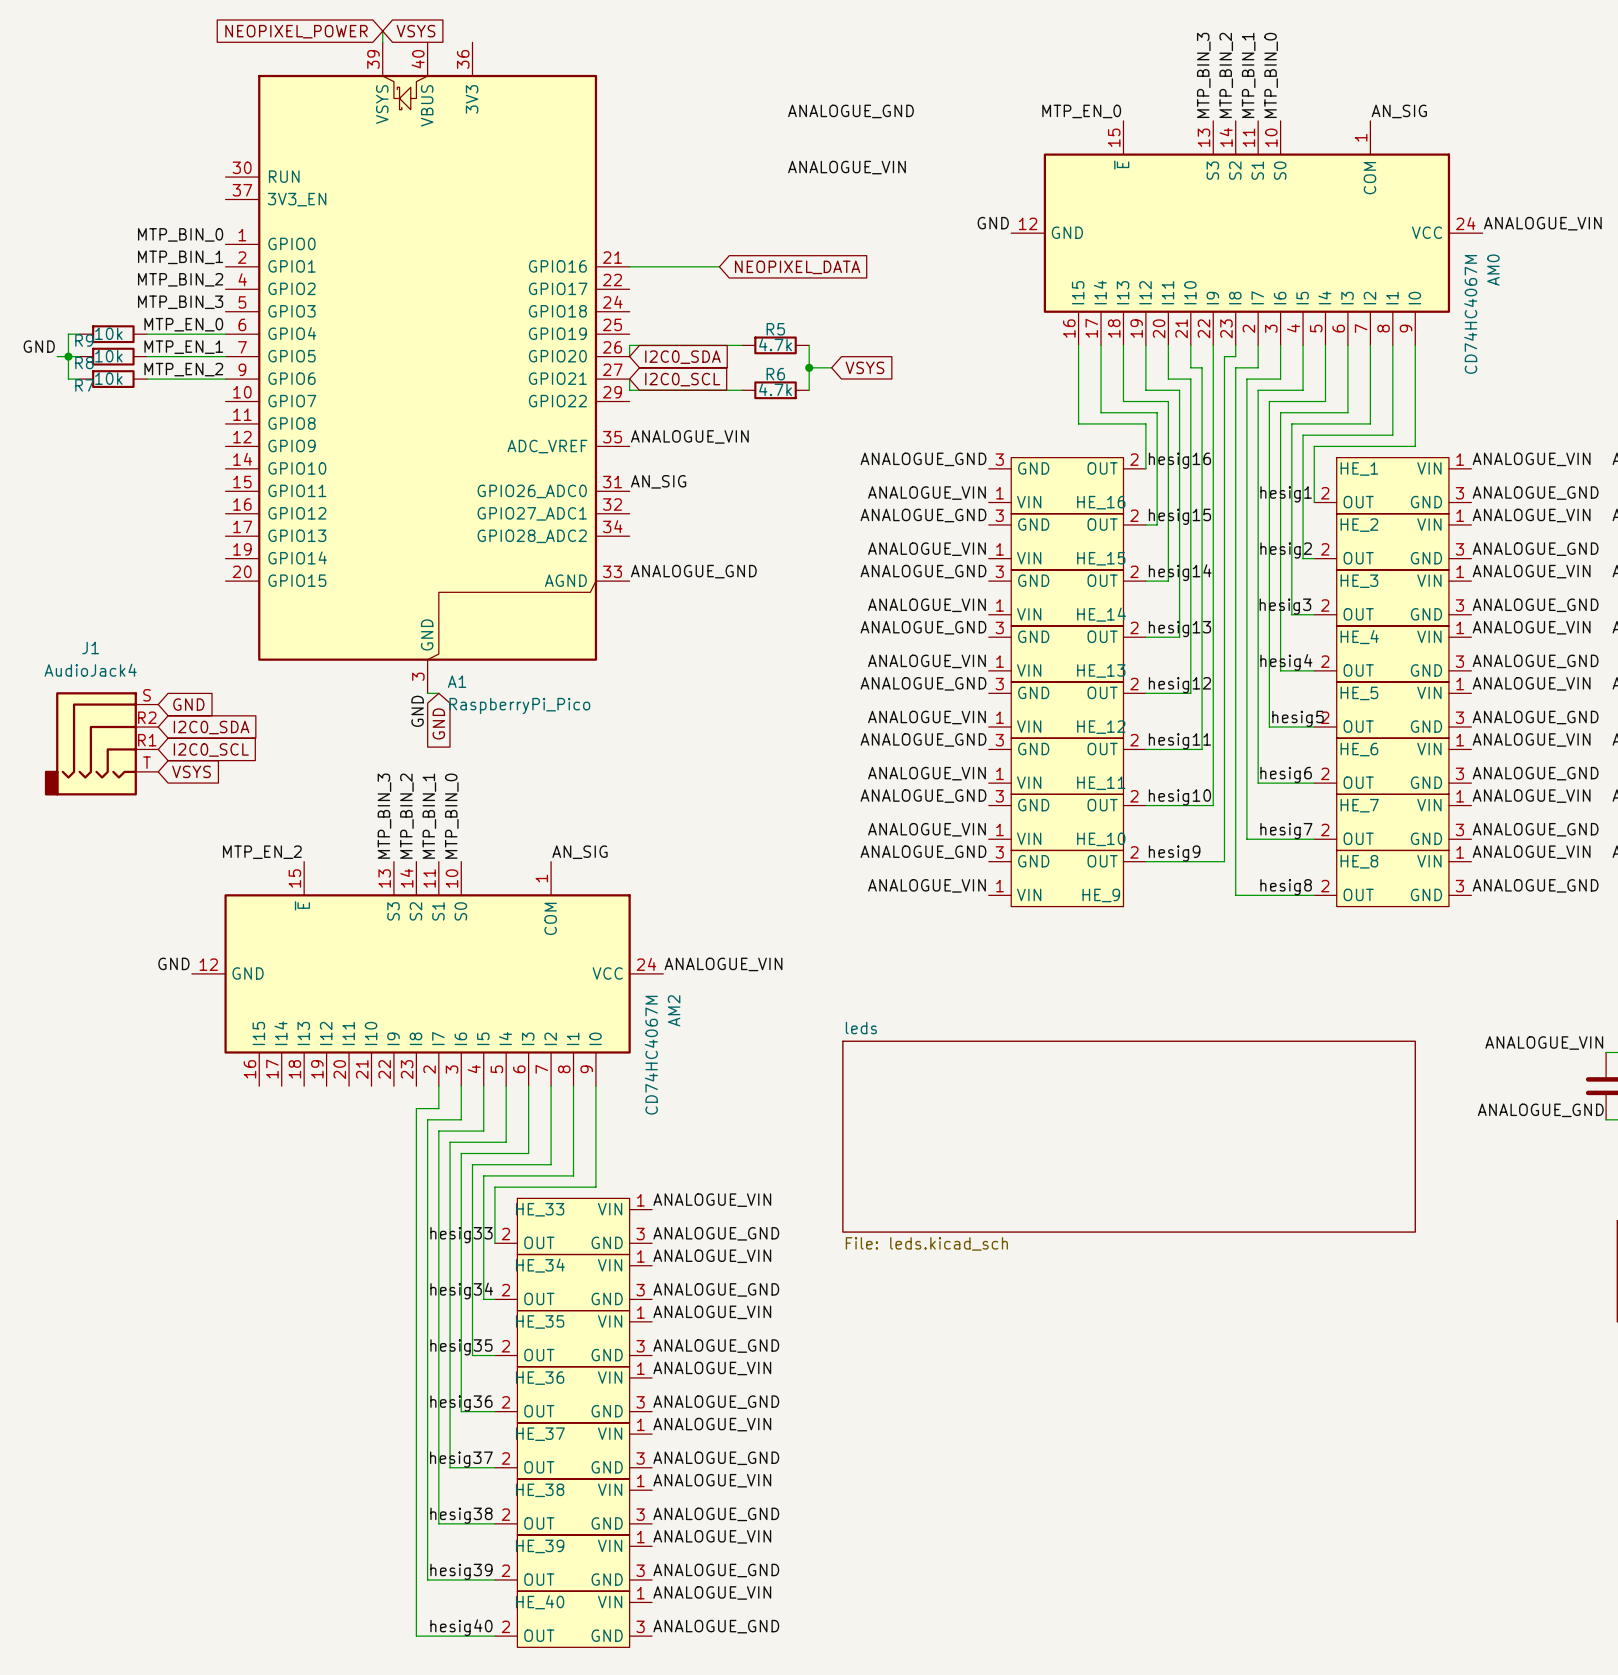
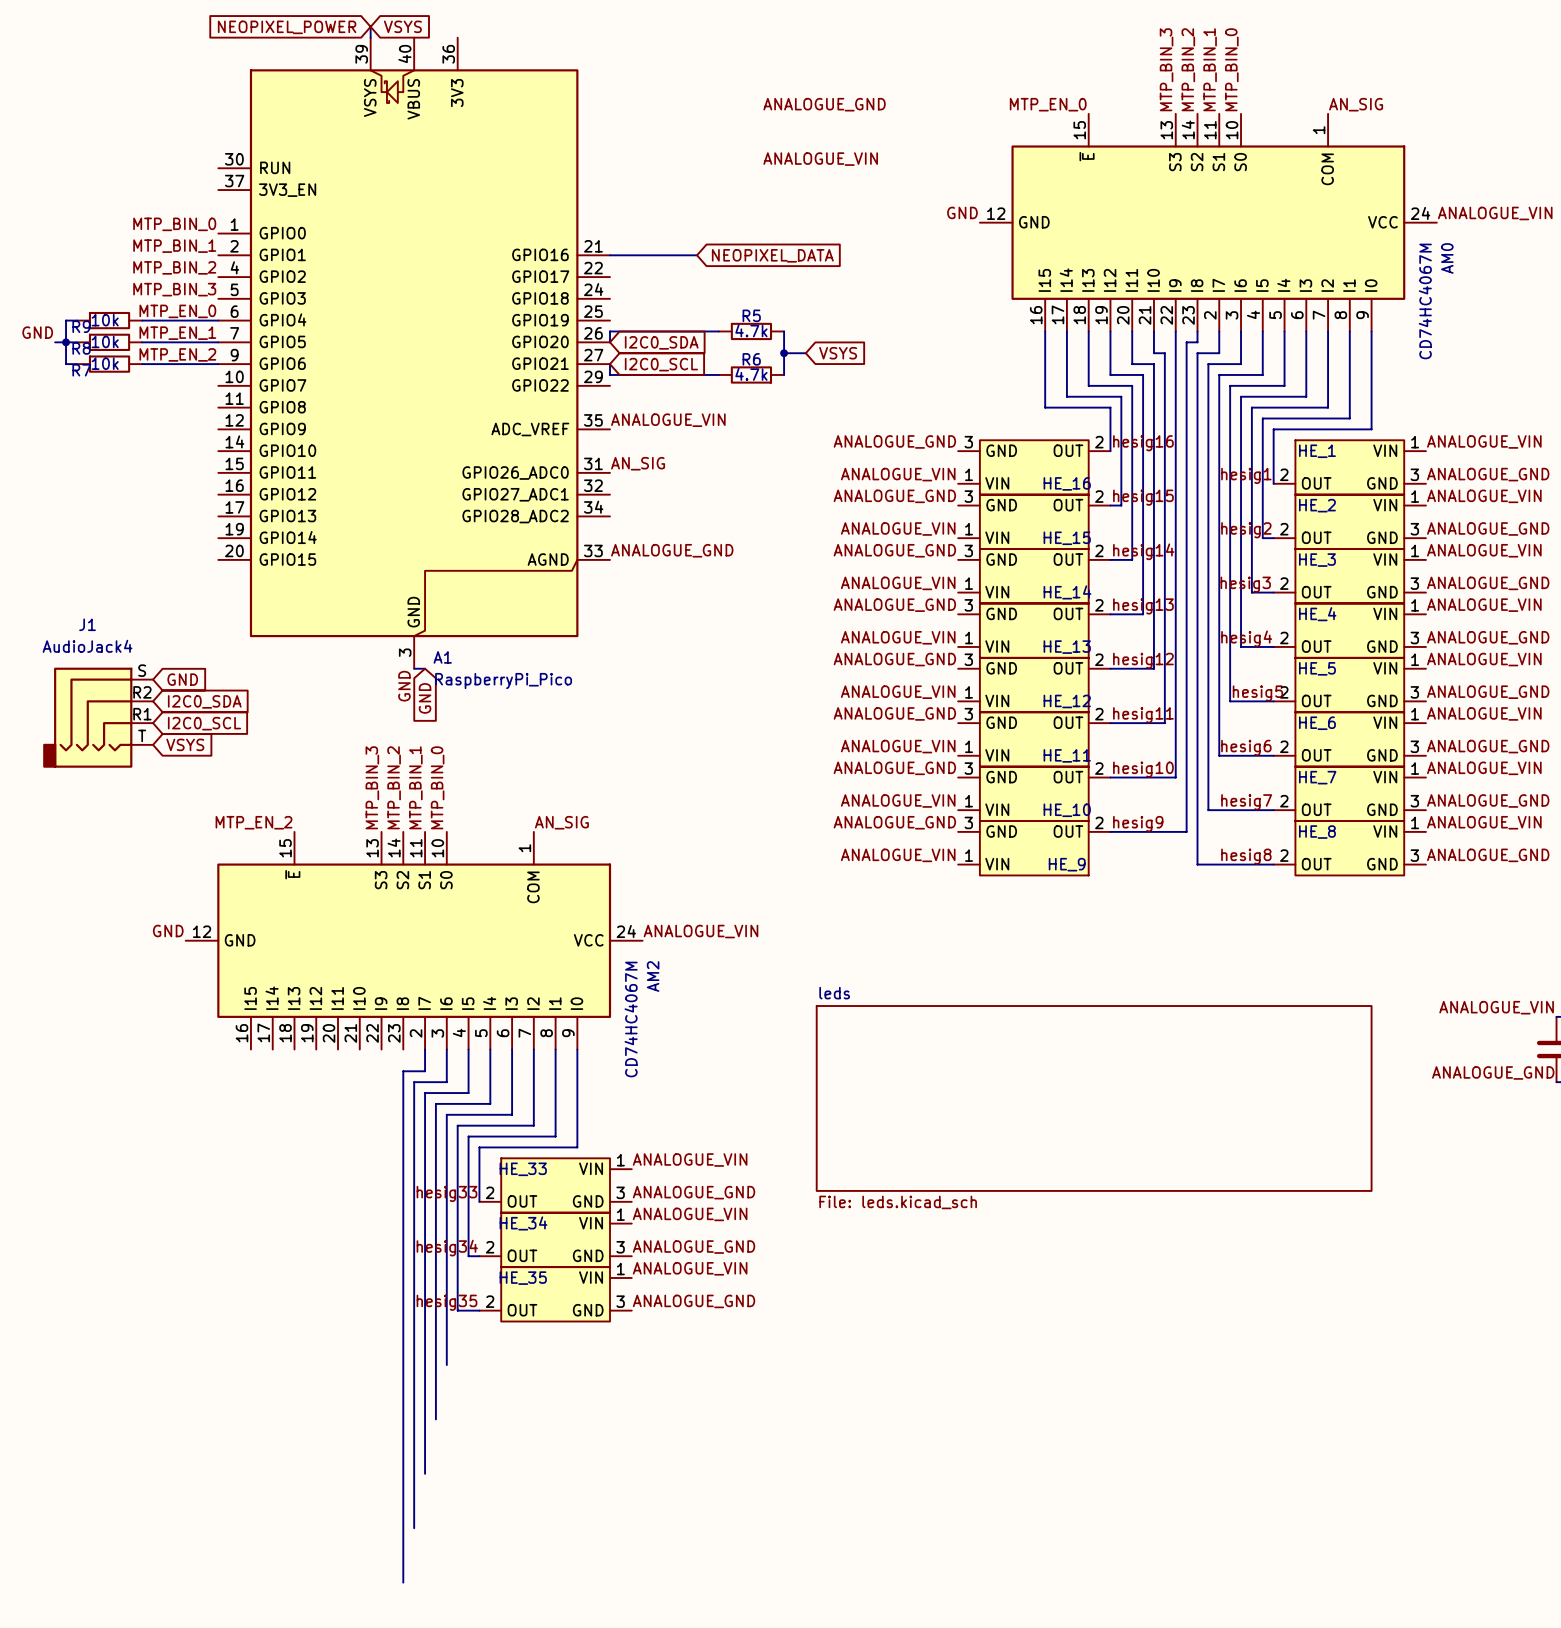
label: ANALOGUE_VIN (712, 1368) -> none
HE_36: (573, 1394) -> none
label: ANALOGUE_GND (716, 1402) -> none
label: hesig36 (461, 1403) -> none
wire: (461, 1411) (494, 1411) -> none
label: ANALOGUE_VIN (712, 1424) -> none
HE_37: (573, 1450) -> none
label: ANALOGUE_GND (716, 1458) -> none
label: hesig37 (461, 1459) -> none
wire: (450, 1467) (494, 1467) -> none
label: ANALOGUE_VIN (712, 1480) -> none
HE_38: (573, 1507) -> none
label: ANALOGUE_GND (716, 1514) -> none
label: hesig38 (461, 1515) -> none
wire: (438, 1523) (494, 1523) -> none
label: ANALOGUE_VIN (712, 1536) -> none
HE_39: (573, 1563) -> none
label: ANALOGUE_GND (716, 1570) -> none
label: hesig39 (461, 1571) -> none
wire: (427, 1579) (494, 1579) -> none
label: ANALOGUE_VIN (712, 1592) -> none
HE_40: (573, 1619) -> none
label: ANALOGUE_GND (716, 1626) -> none
label: hesig40 (461, 1627) -> none
wire: (416, 1636) (494, 1636) -> none

